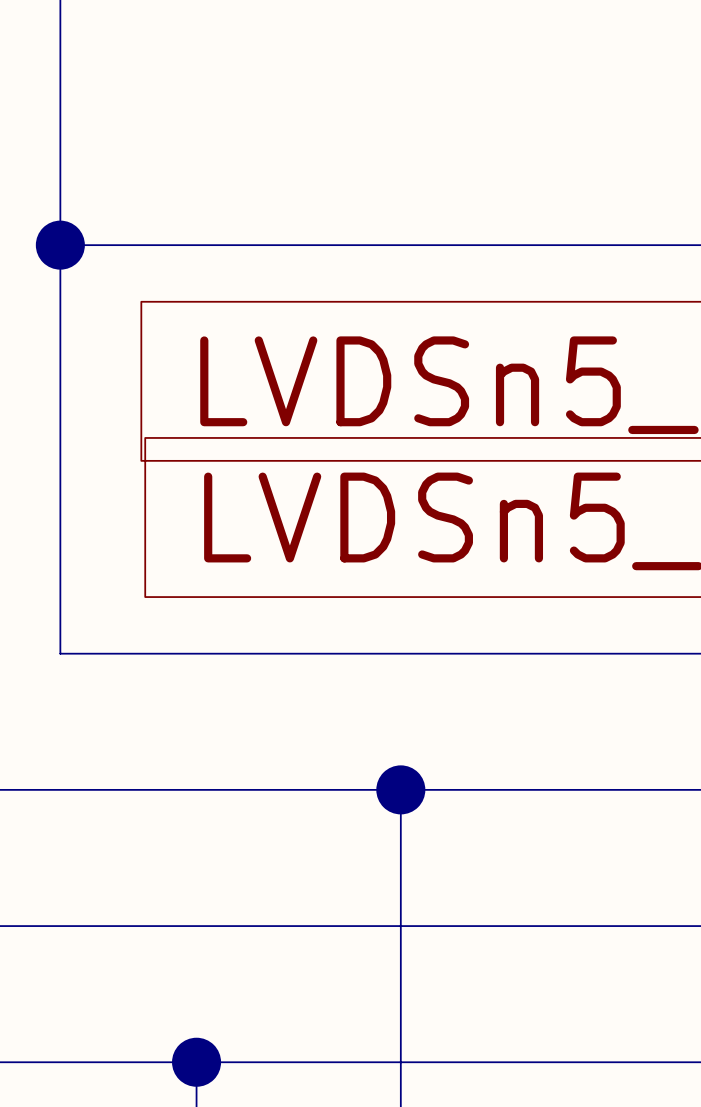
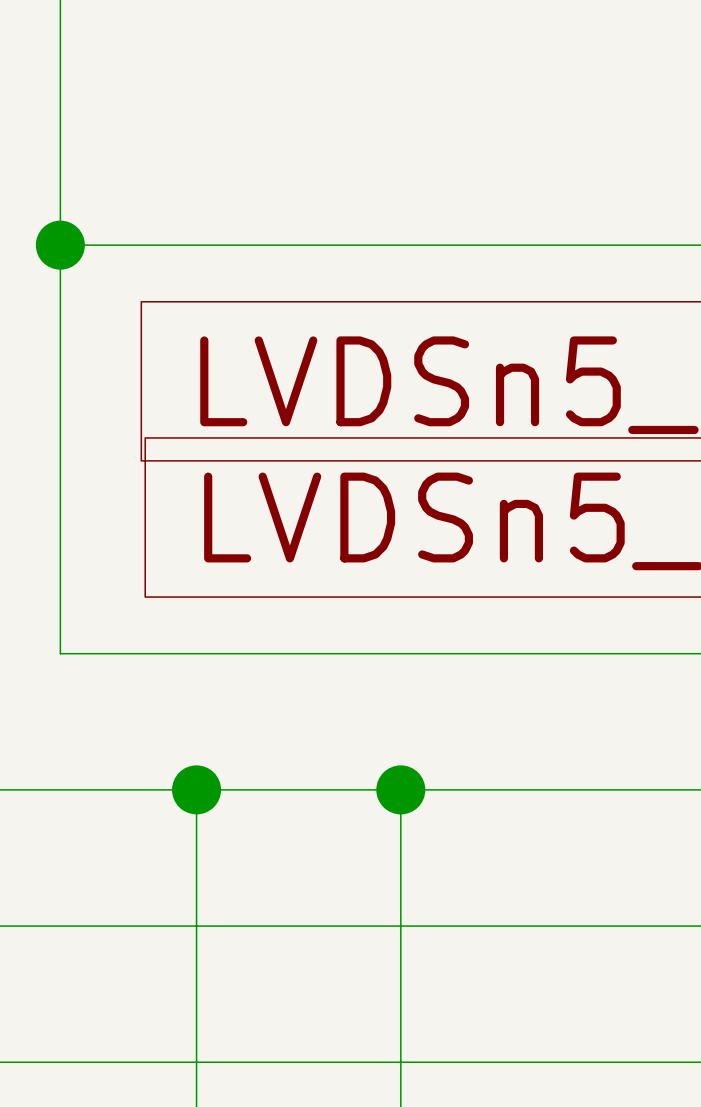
wire: none -> (196, 789) (196, 1062)
junction: none -> (196, 789)
junction: (196, 1062) -> none

